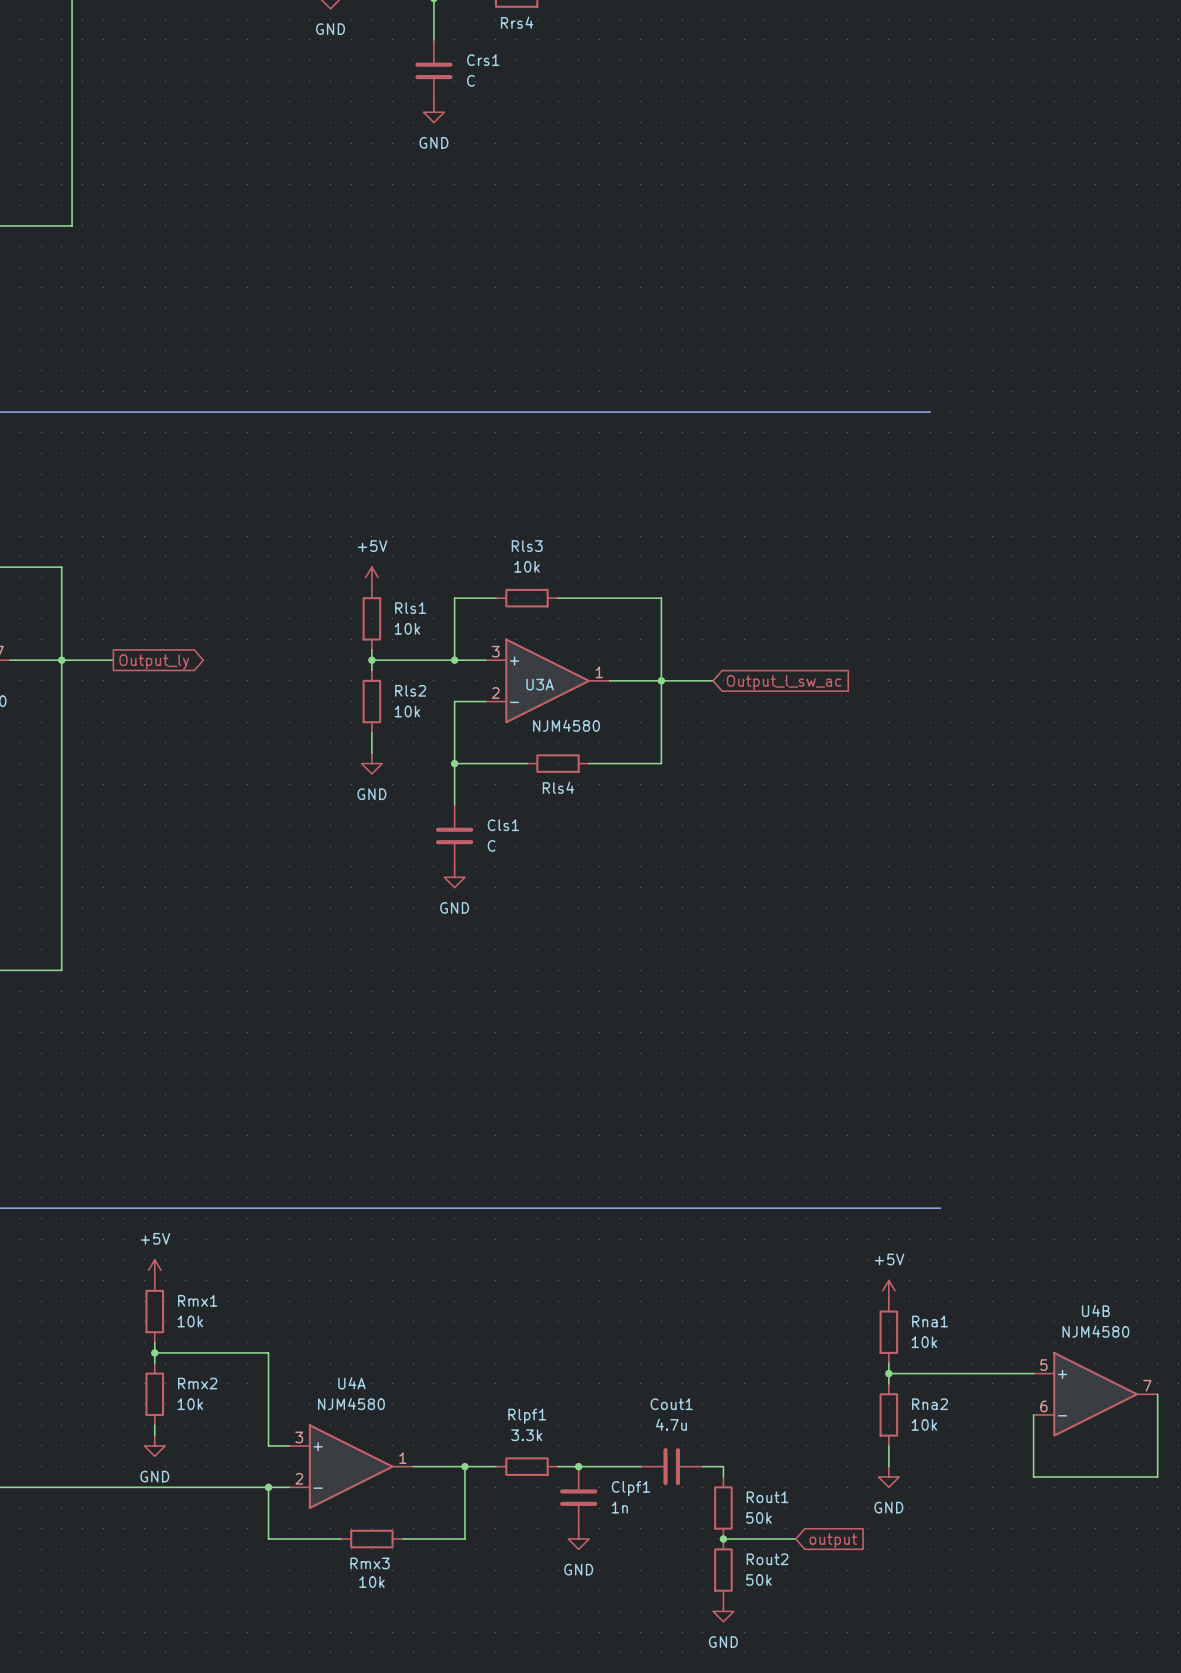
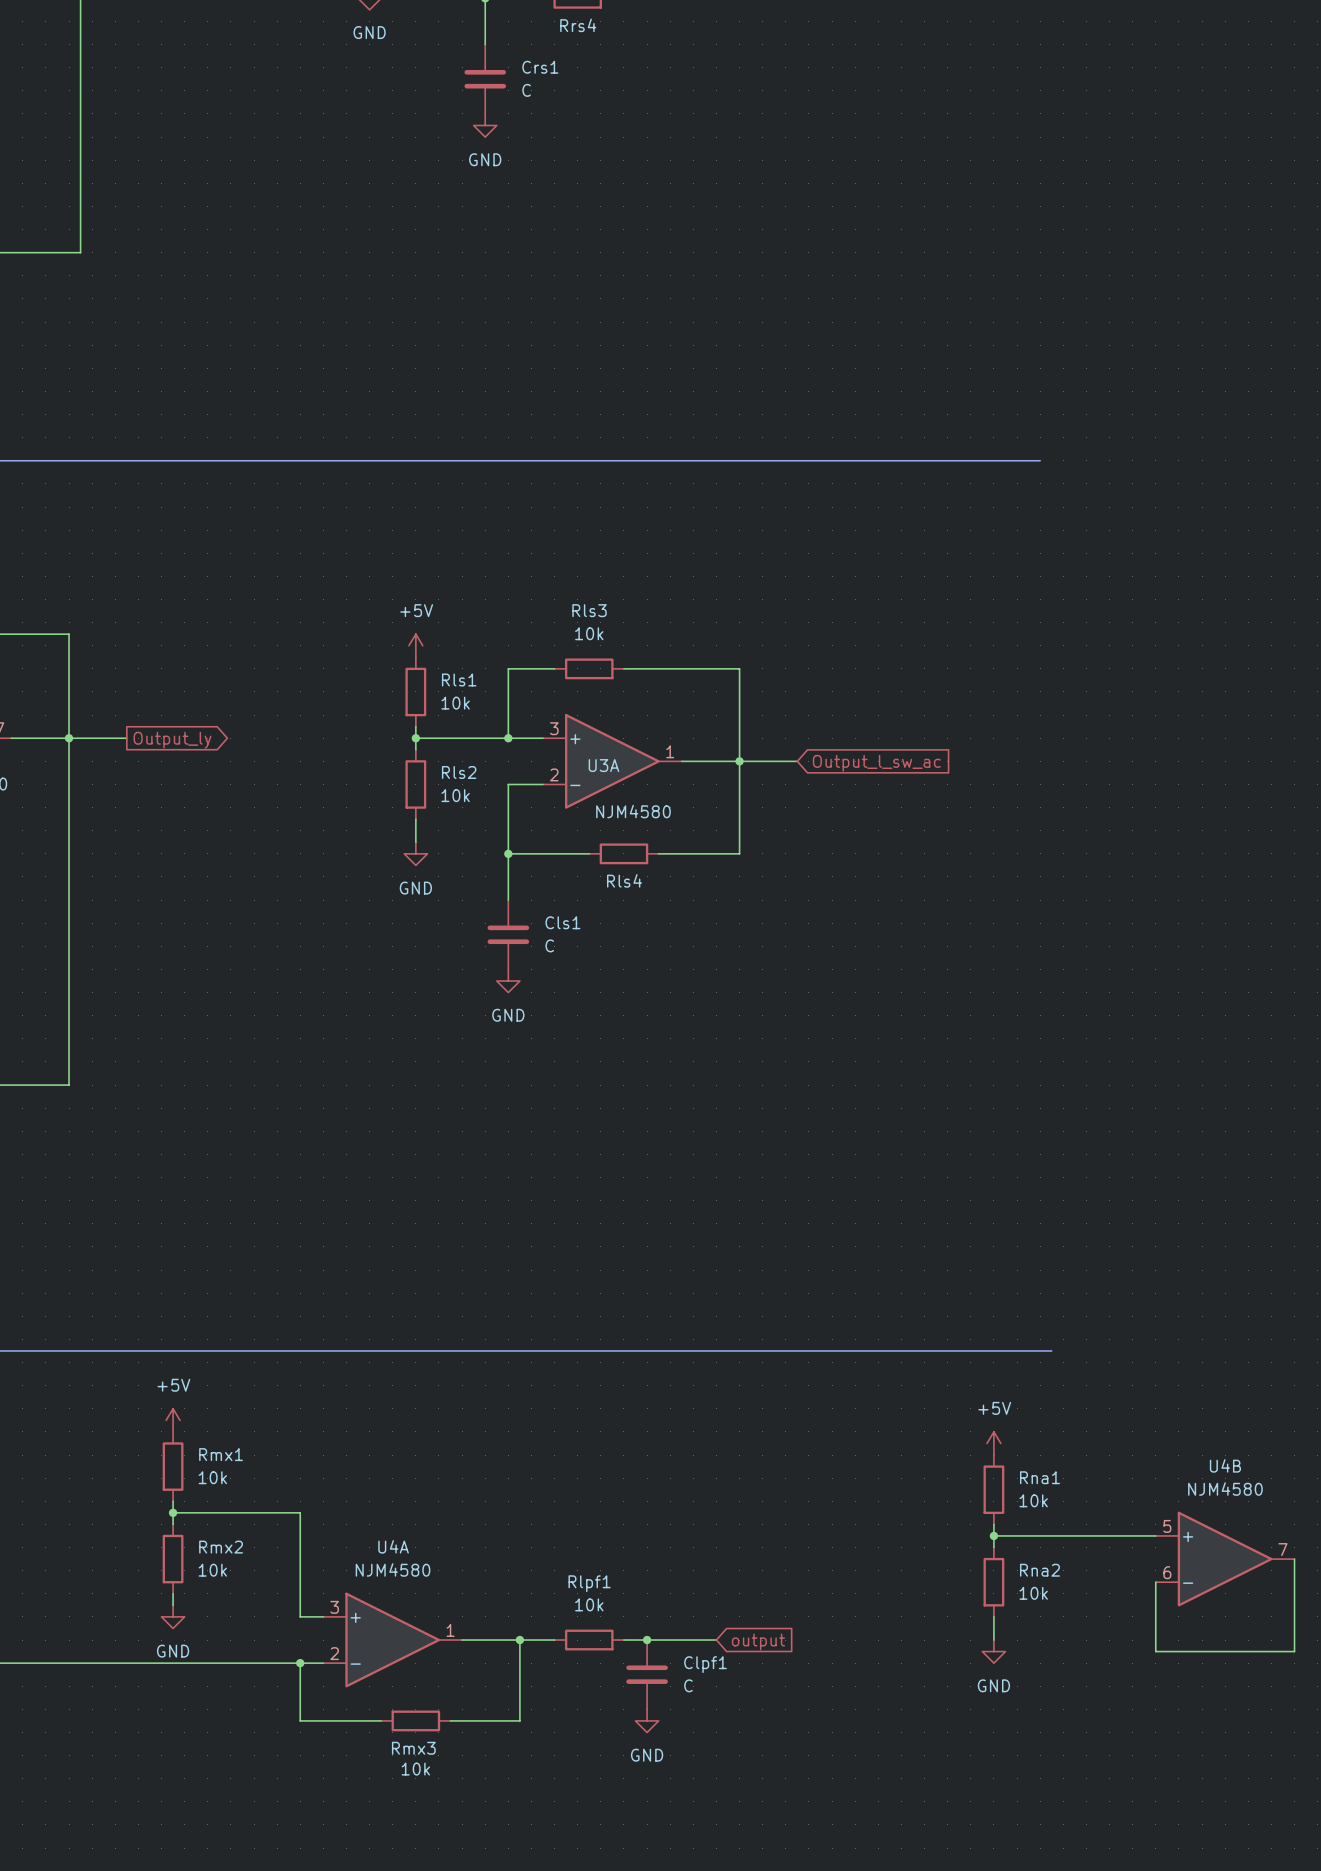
Rlpf1 value: 3.3k (526, 1435) -> 10k (589, 1604)
Cout1: 4.7u (671, 1466) -> none
wire: (702, 1466) (723, 1466) (723, 1476) -> none
Clpf1 value: 1n (619, 1507) -> C (688, 1685)
Rout1: 50k (723, 1508) -> none
wire: (723, 1539) (795, 1539) -> none
junction: (723, 1539) -> none
global label position: output (833, 1540) -> output (758, 1641)
Rout2: 50k (723, 1570) -> none
power symbol: GND (723, 1611) -> none

